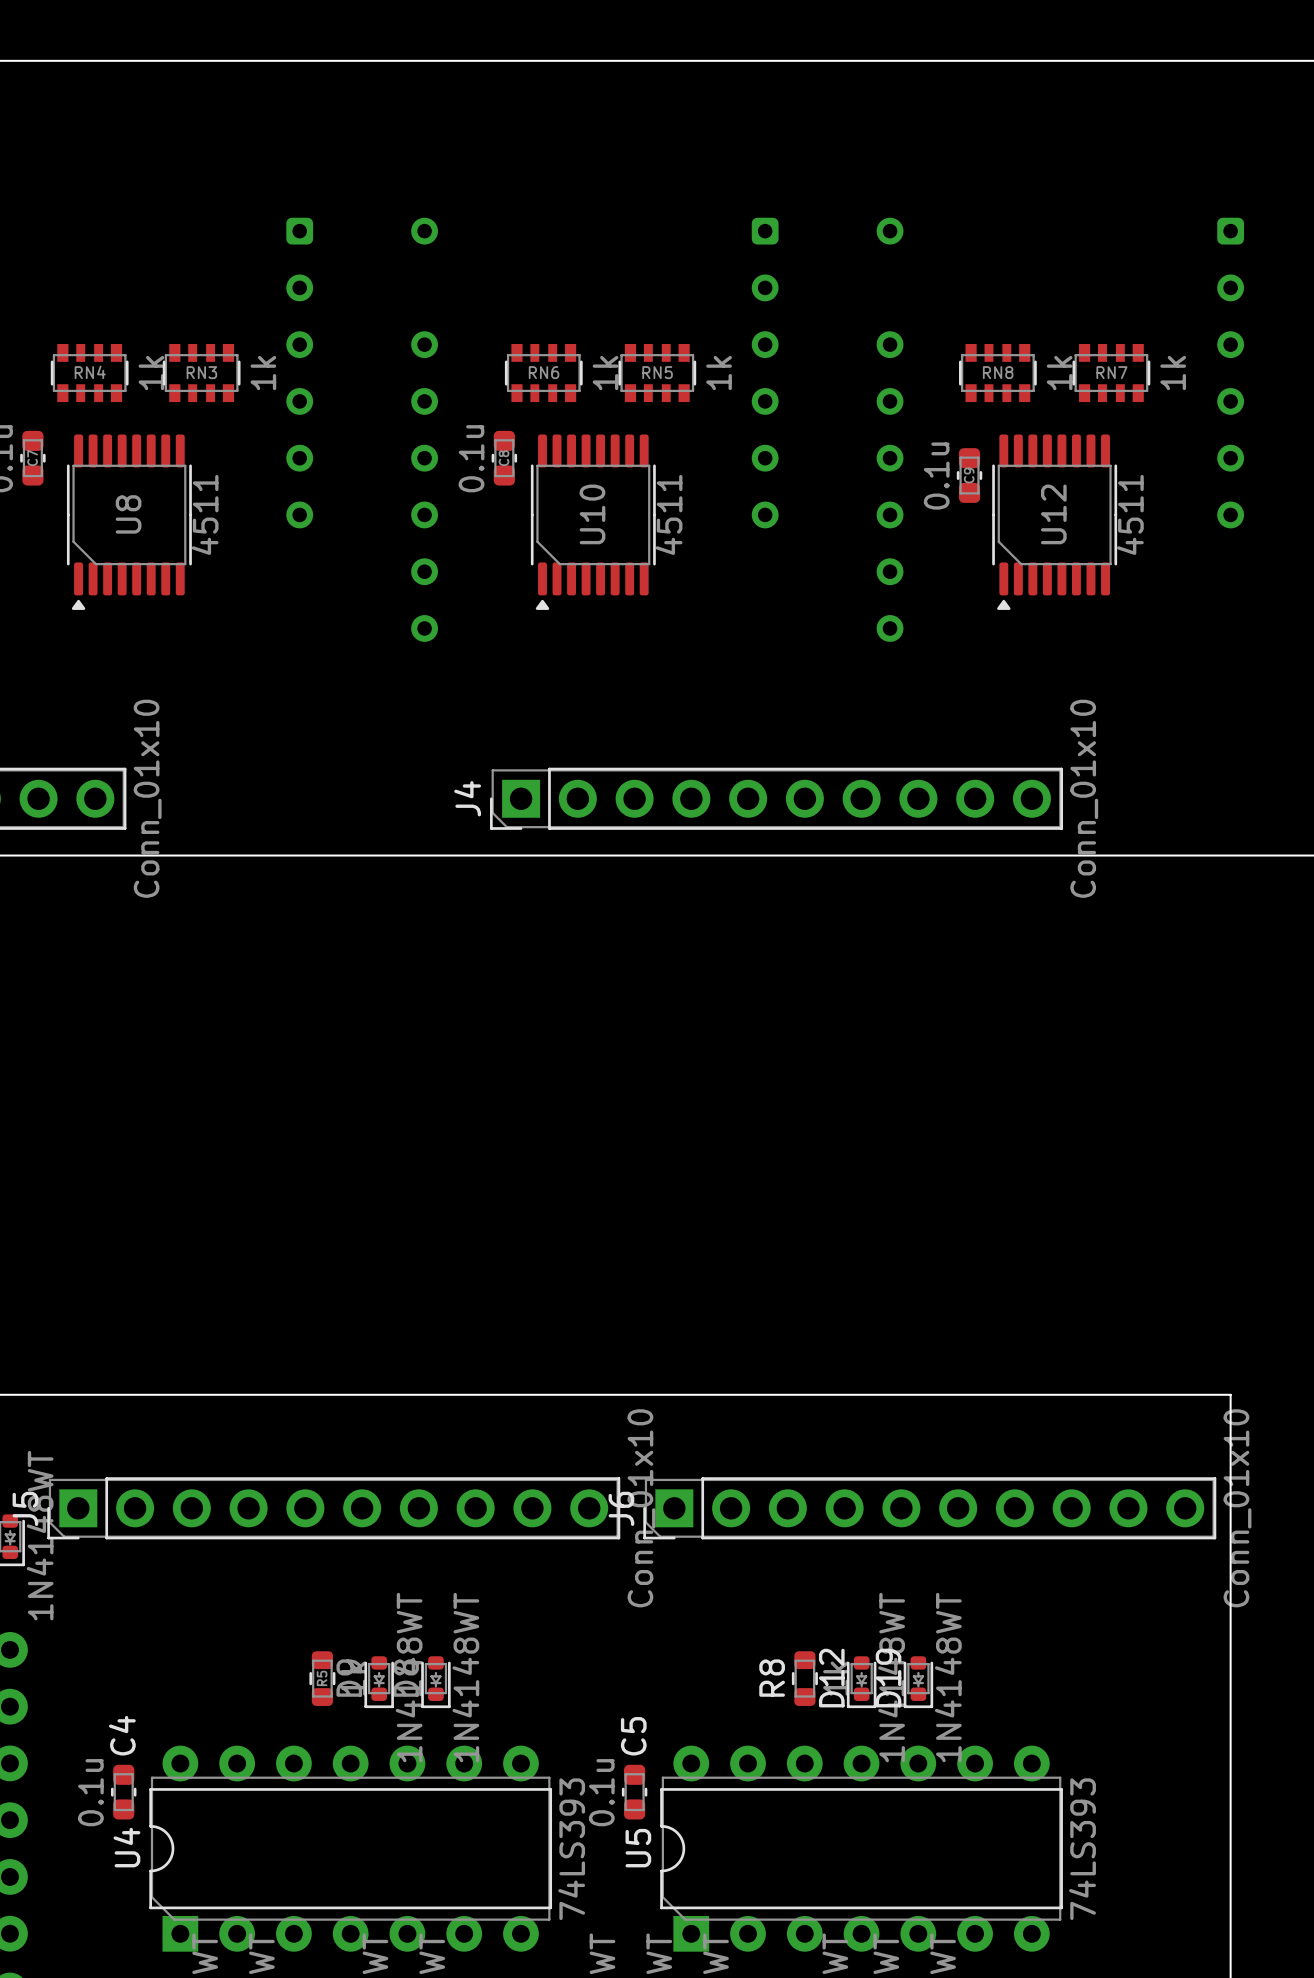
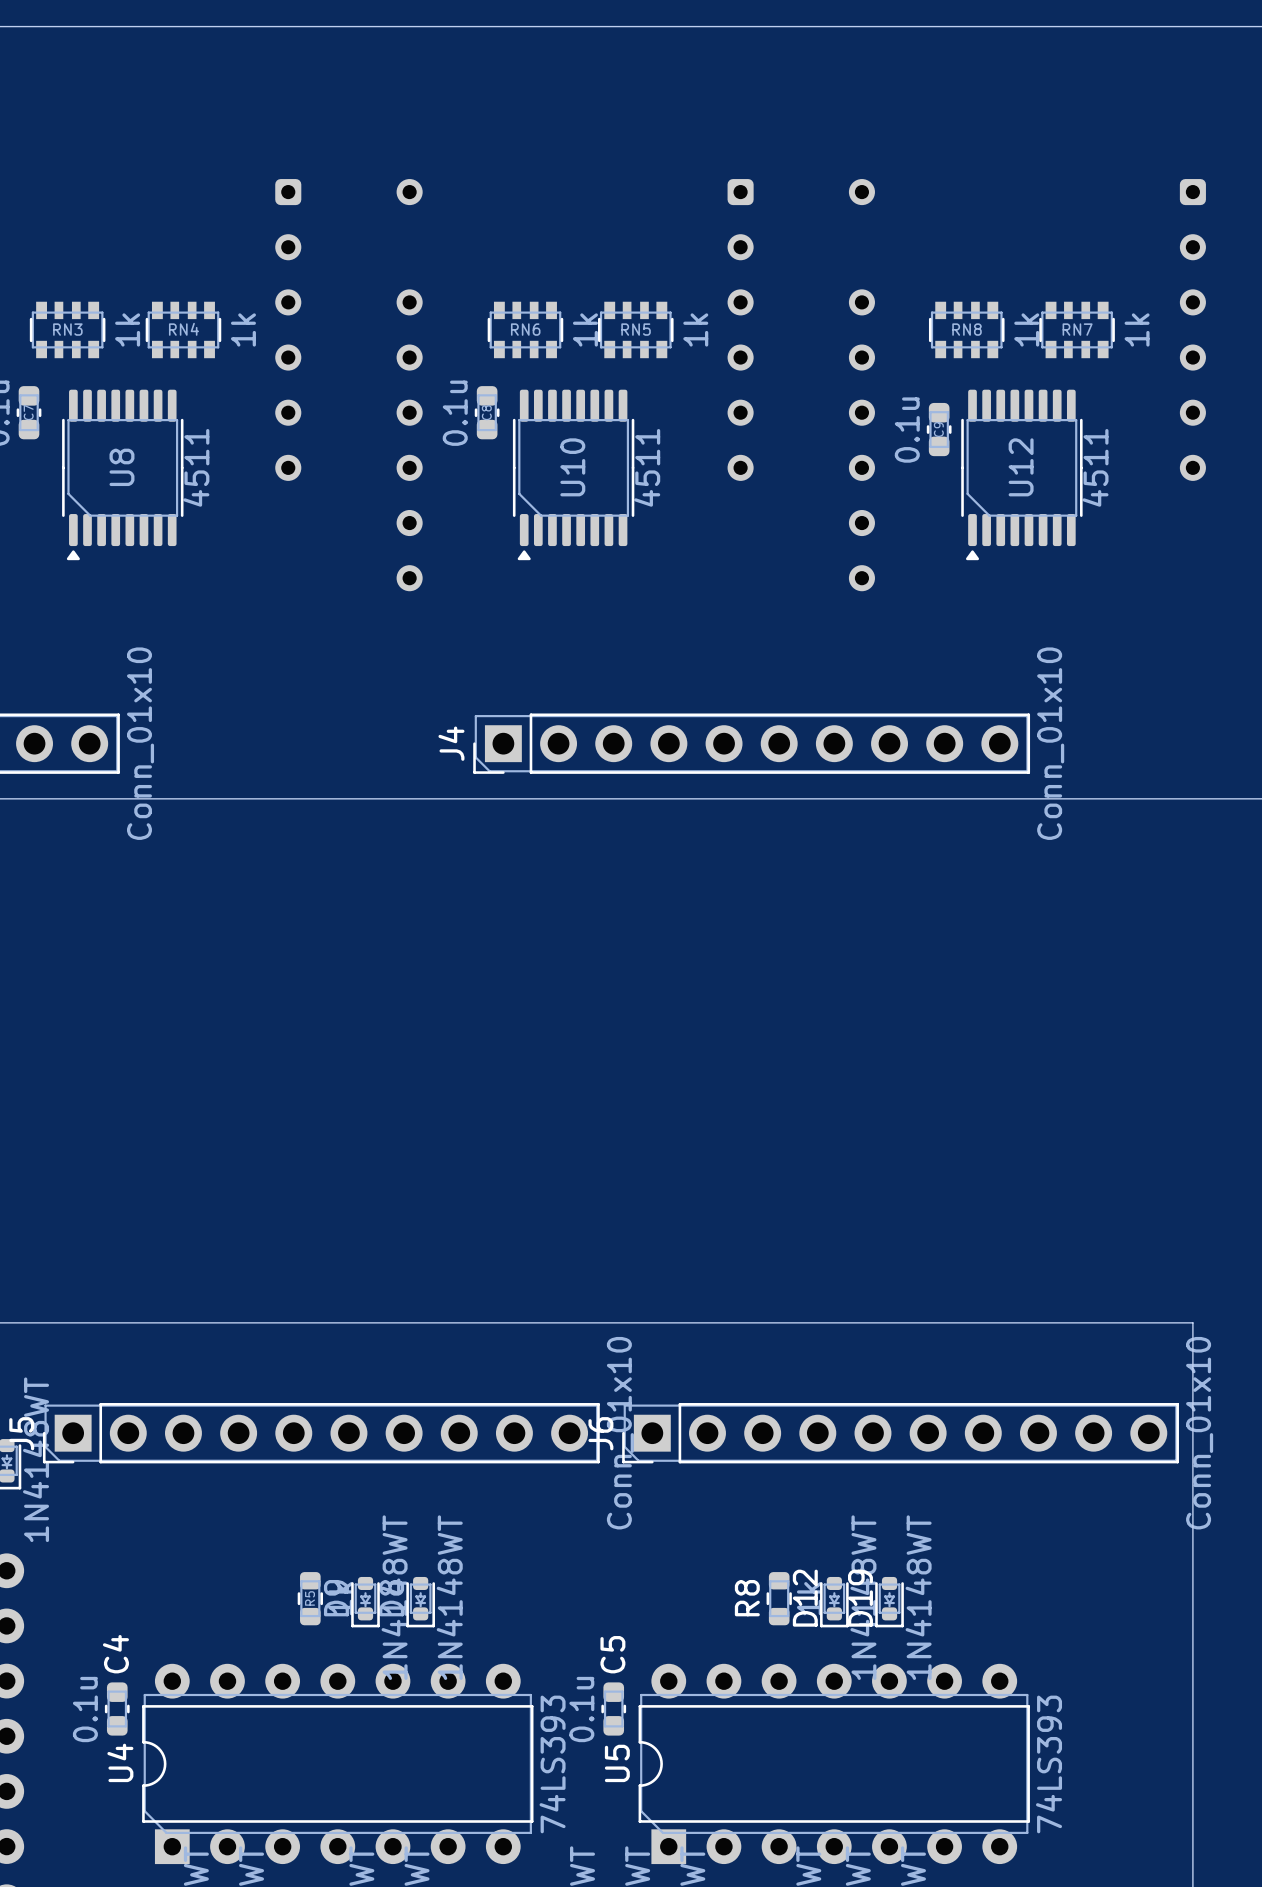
RN4 position: (89, 373) -> (183, 329)
RN3 position: (201, 373) -> (67, 329)

